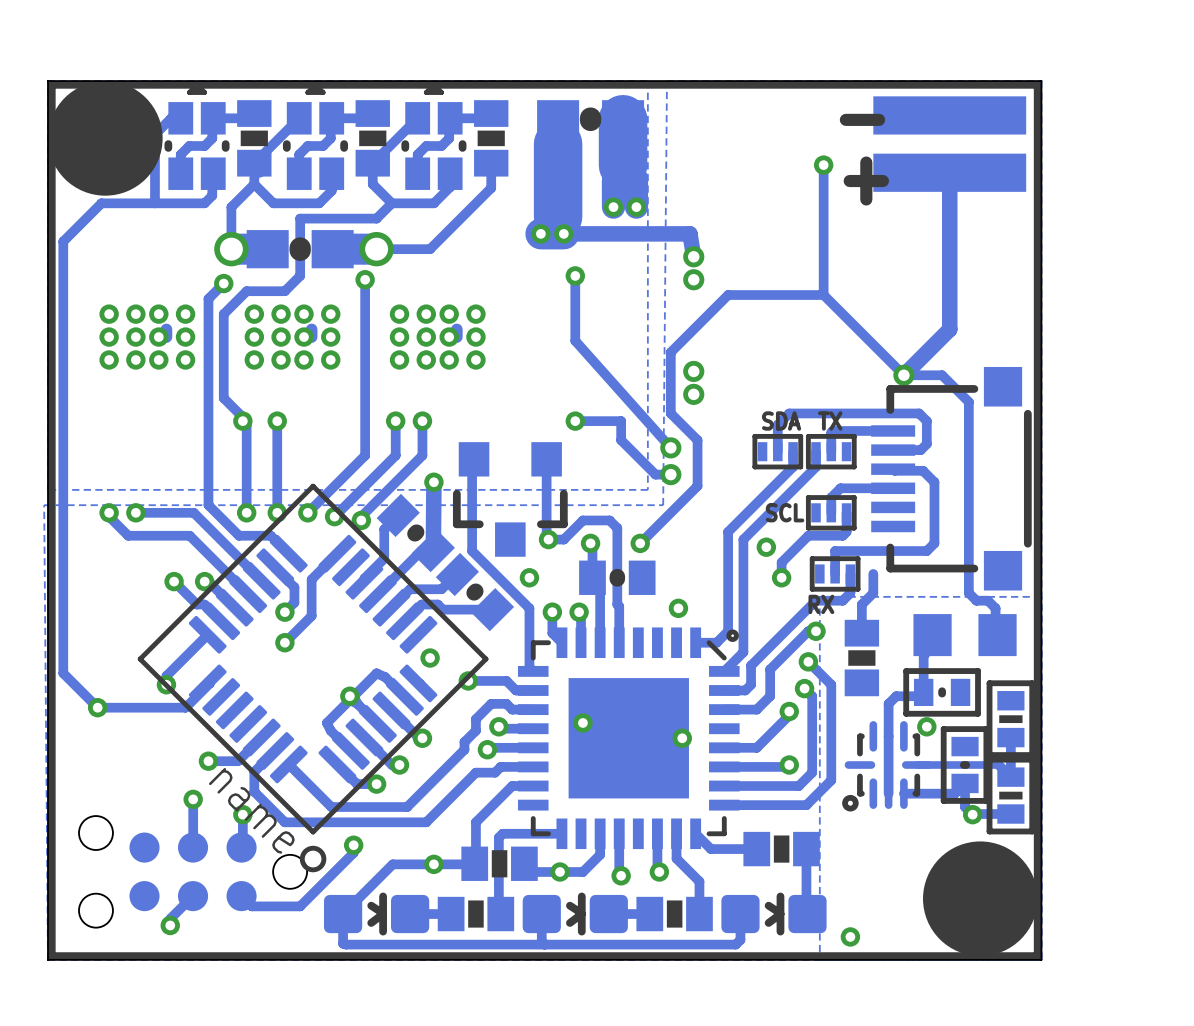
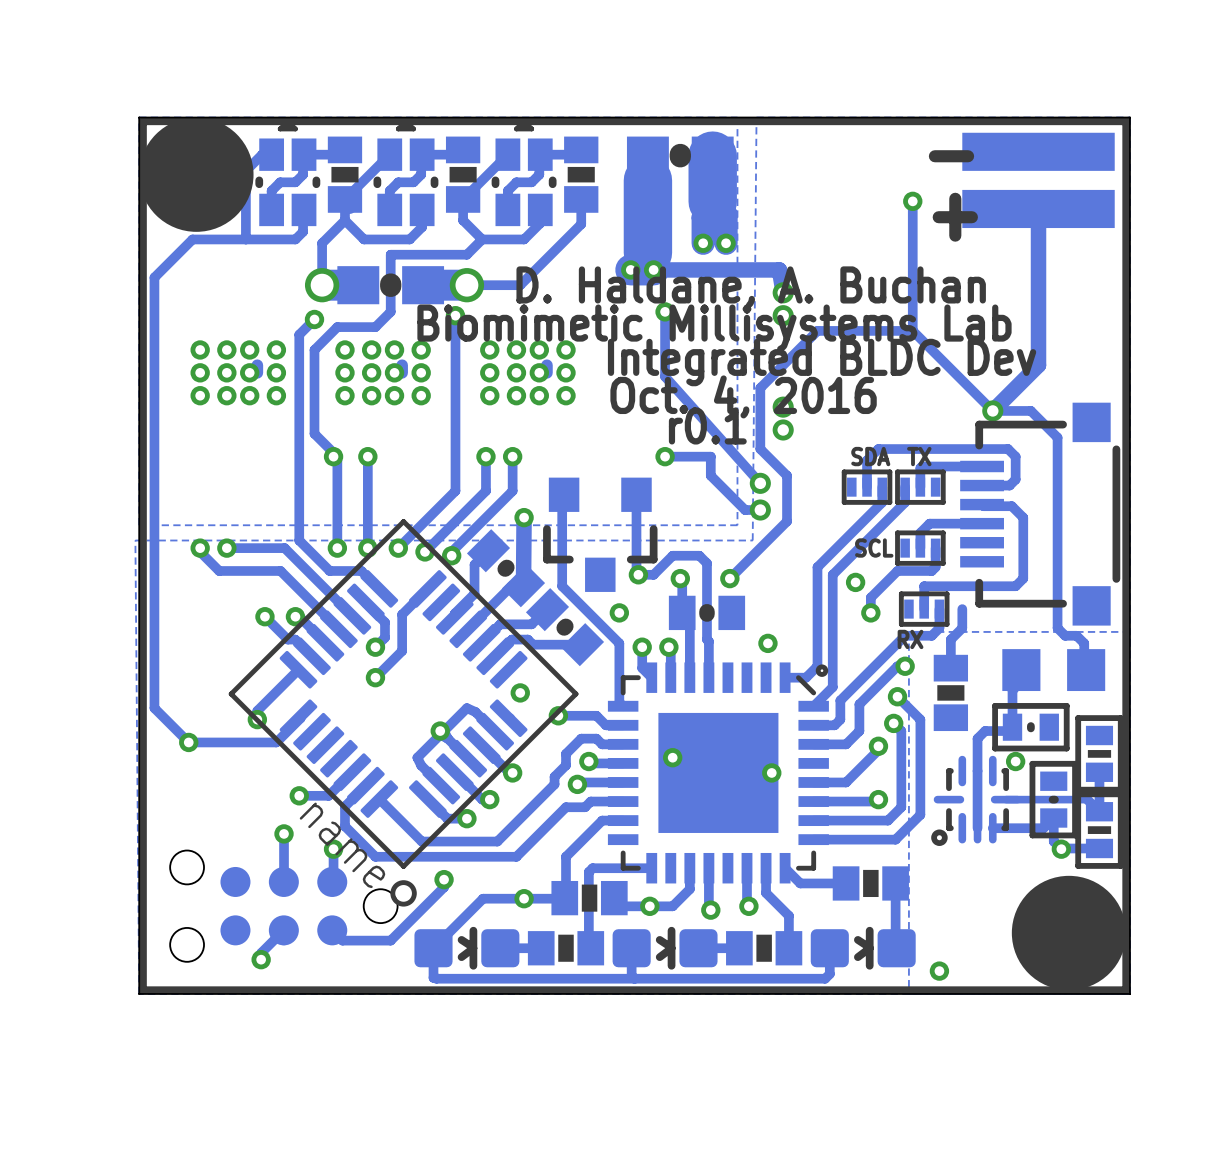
drawing: none -> [417, 266, 1037, 445]

